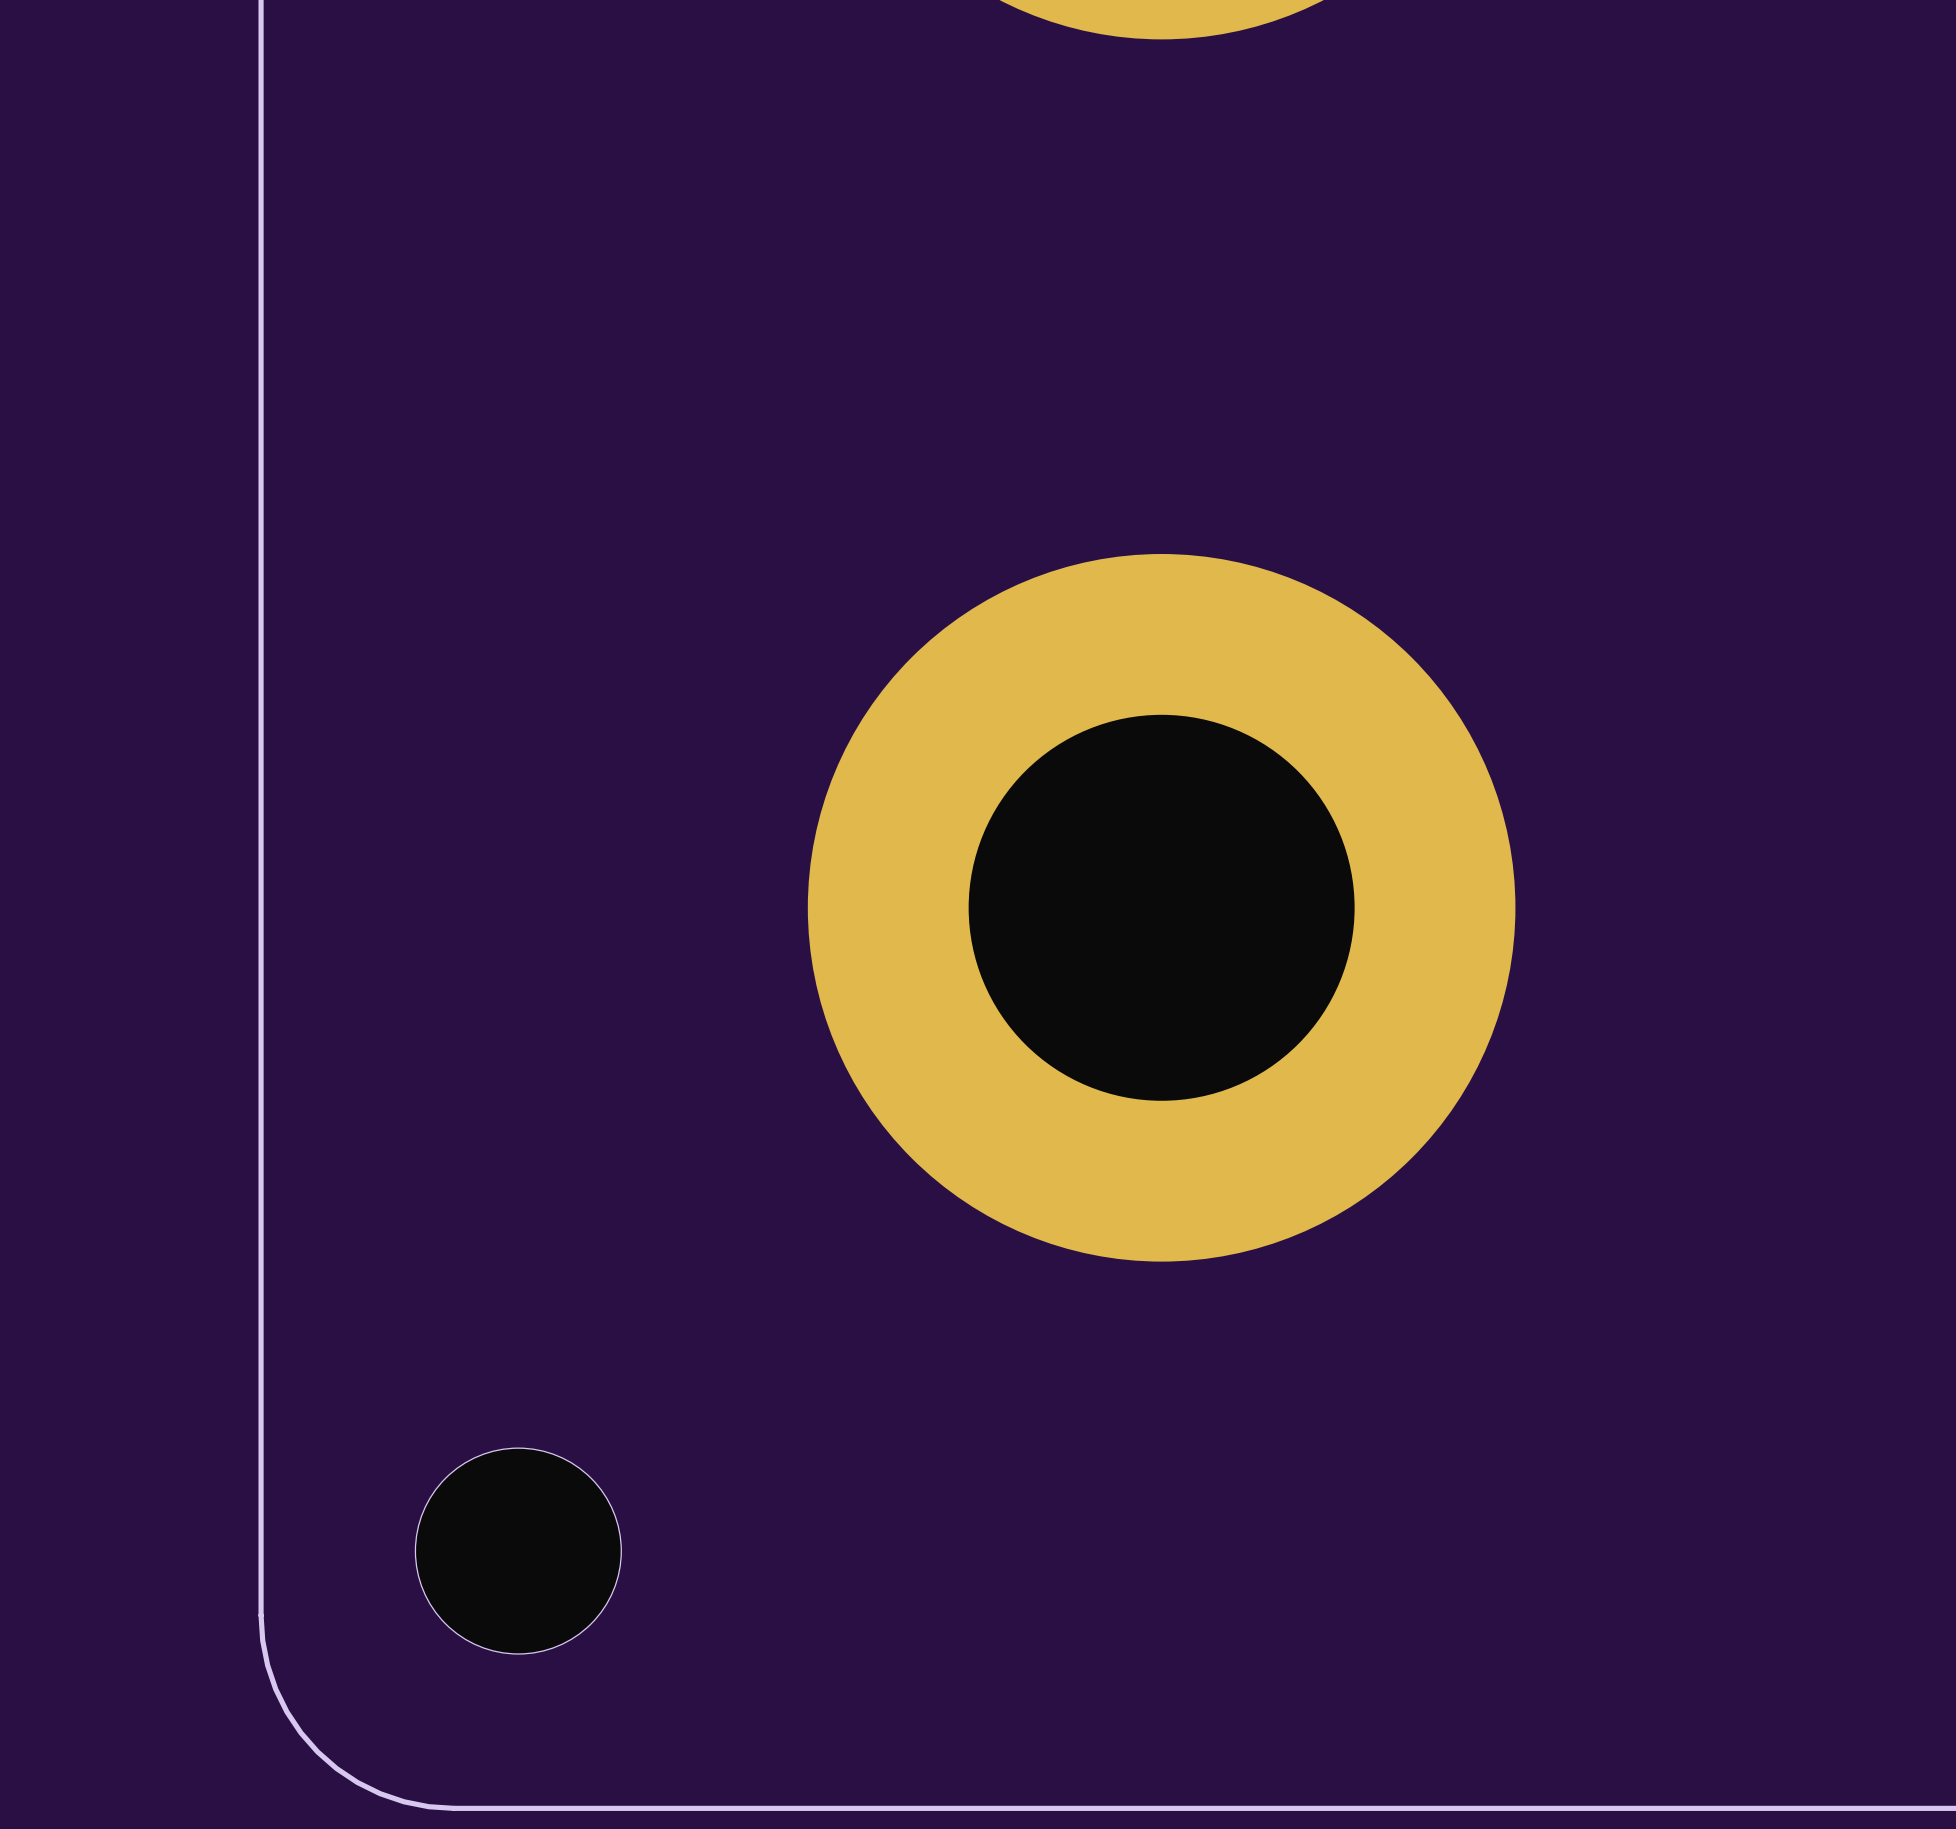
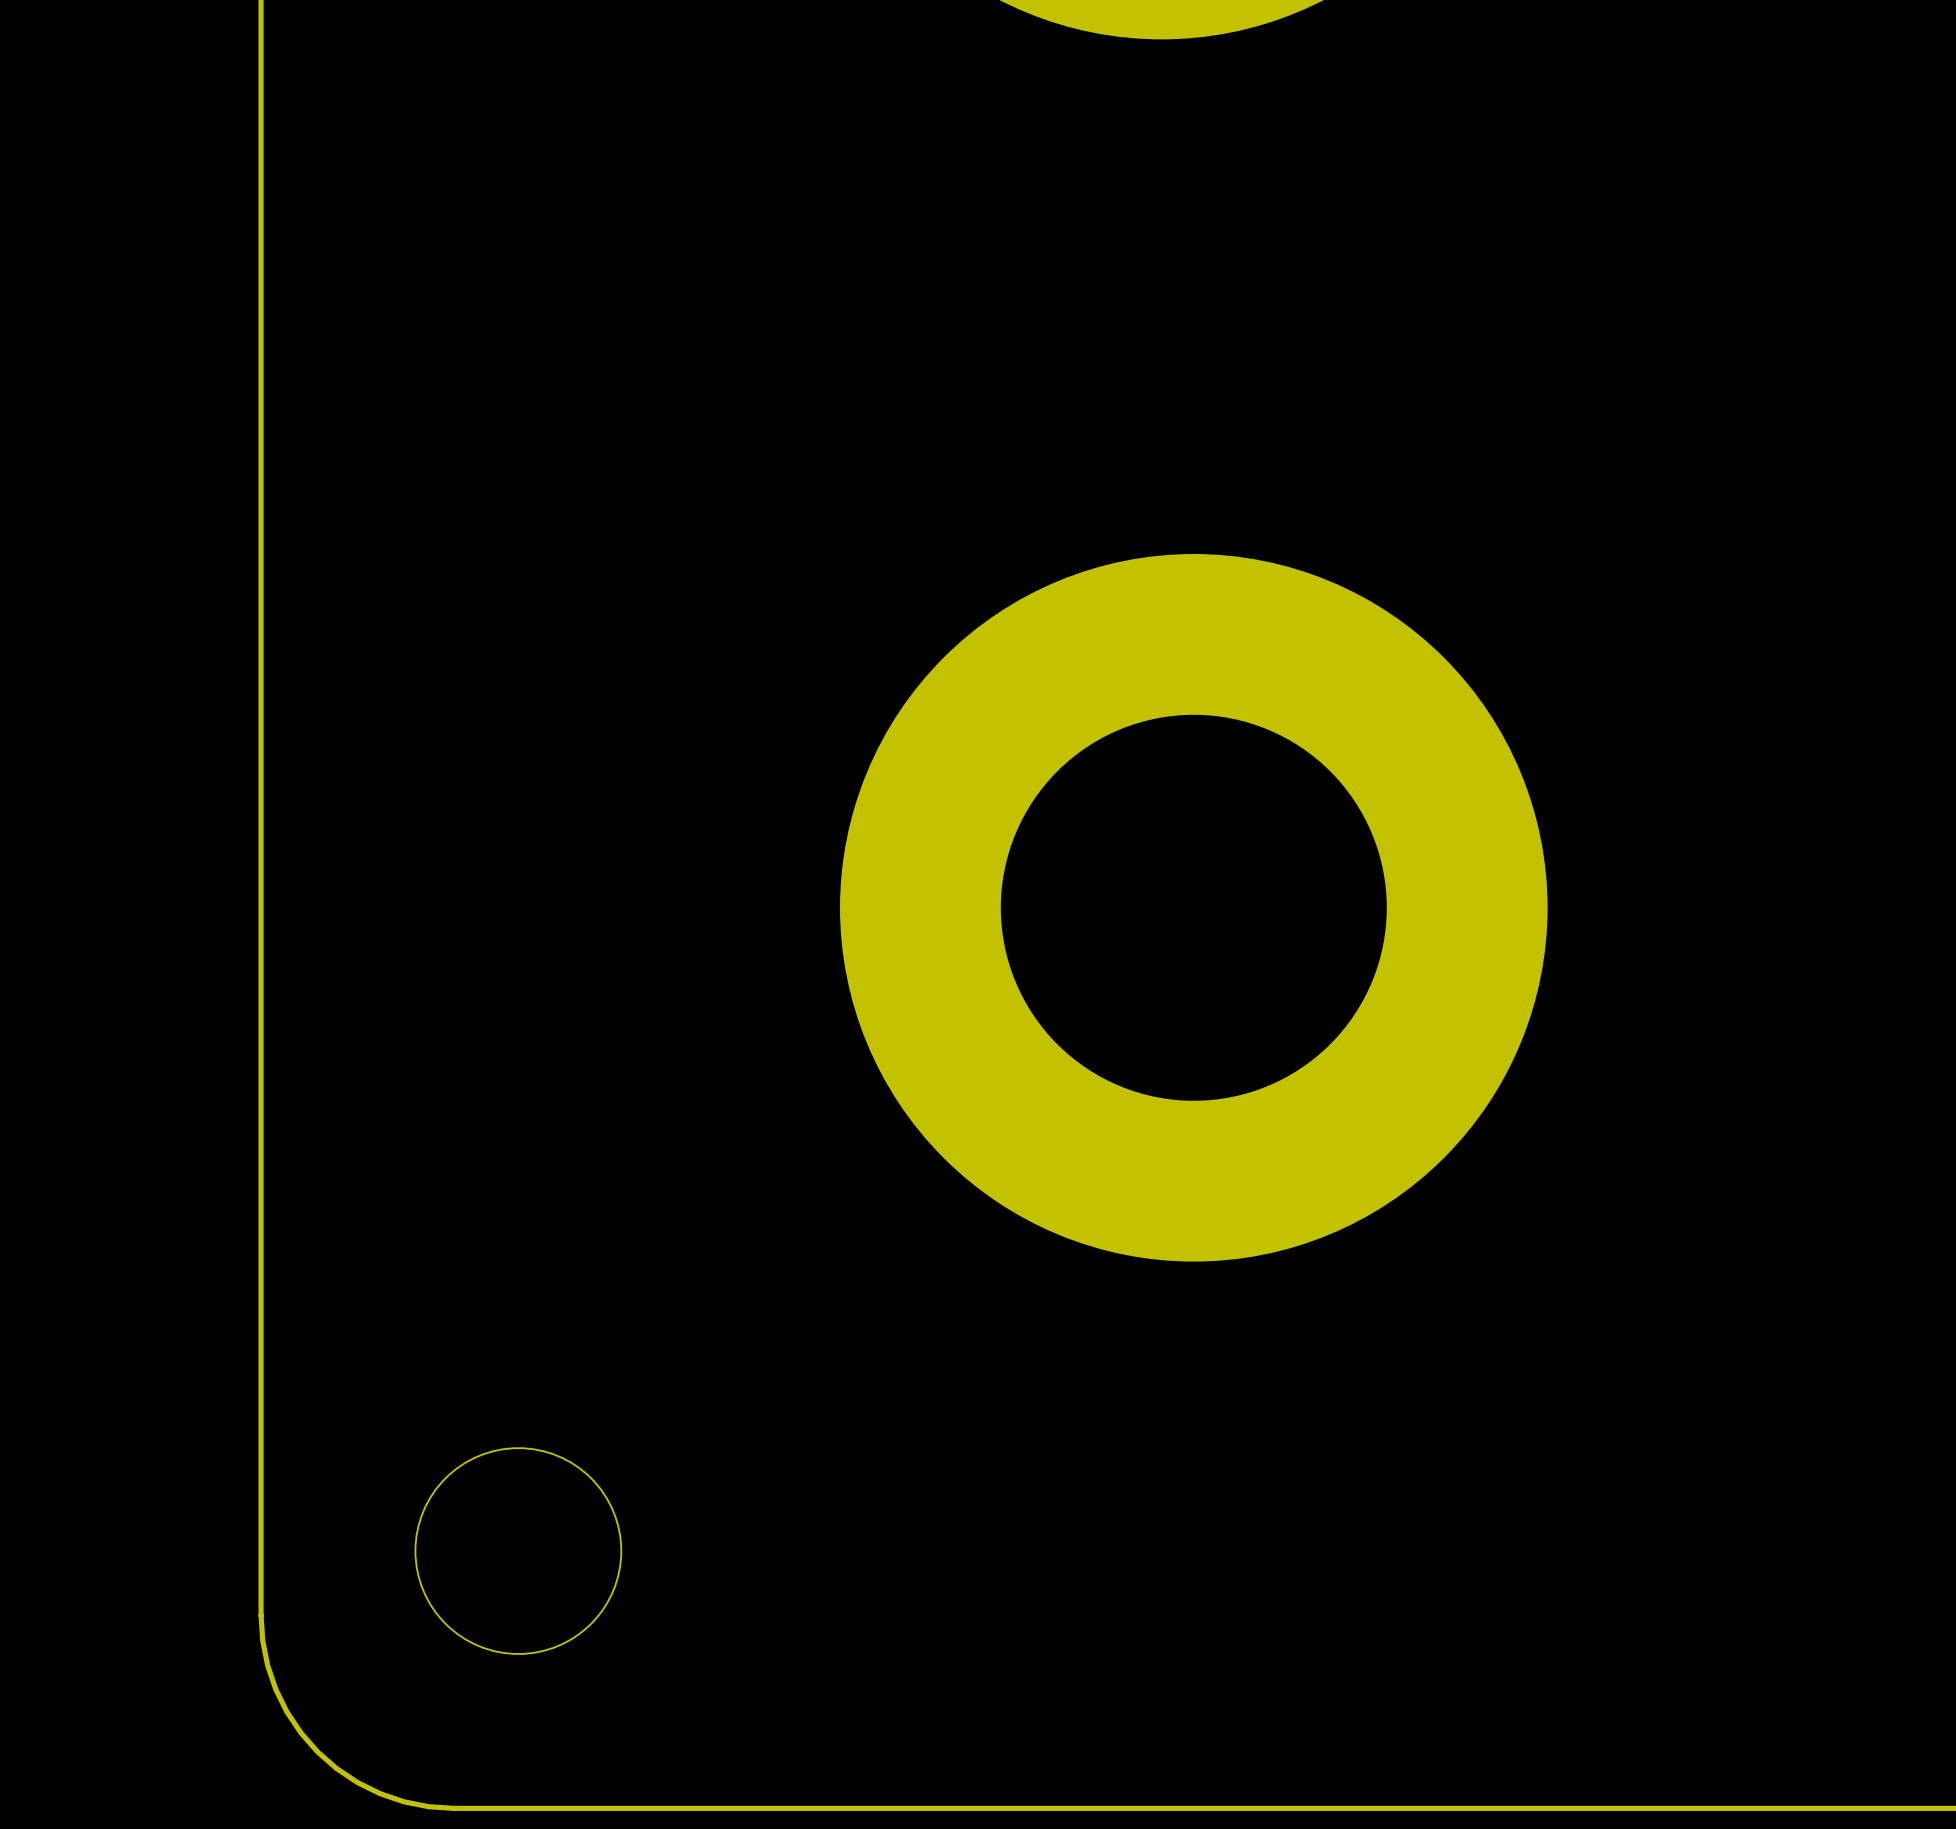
part position: (1161, 907) -> (1193, 907)

